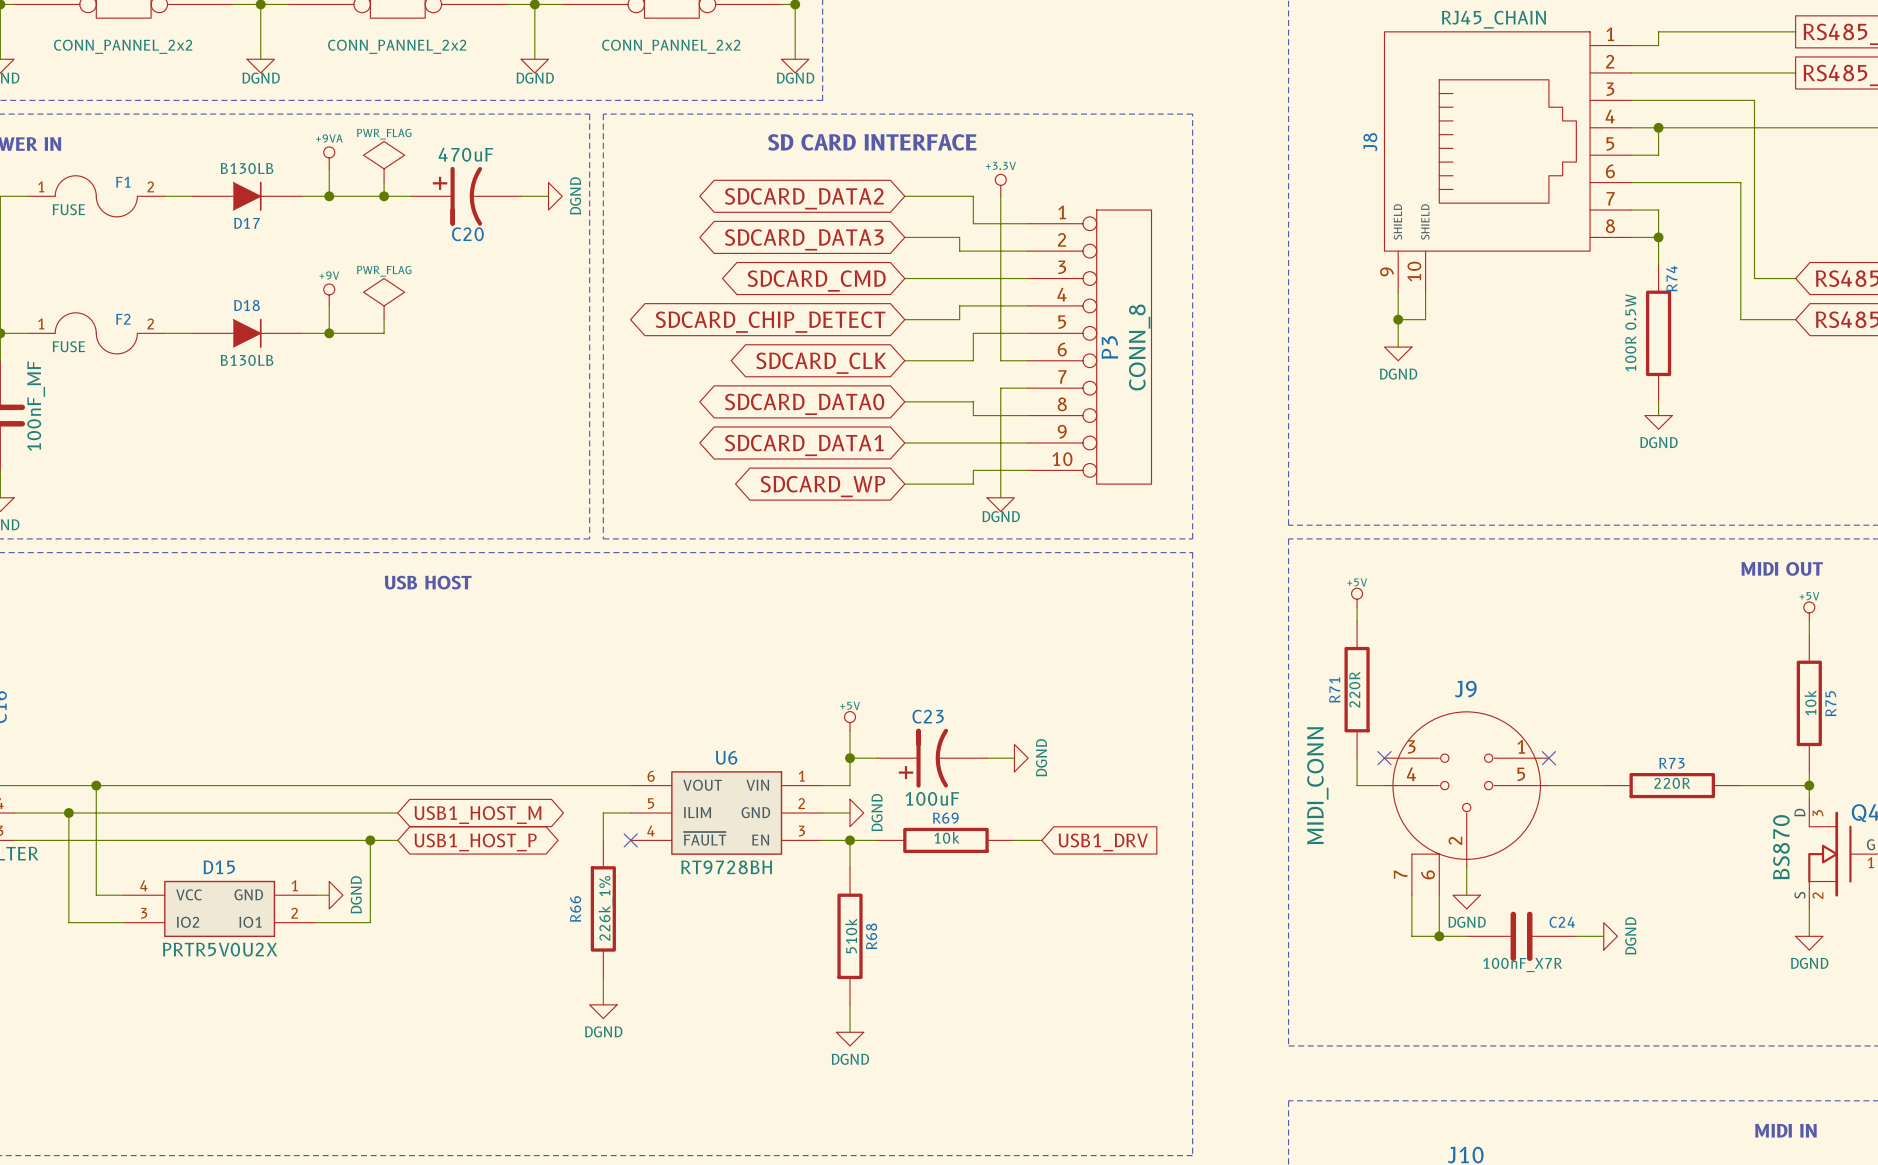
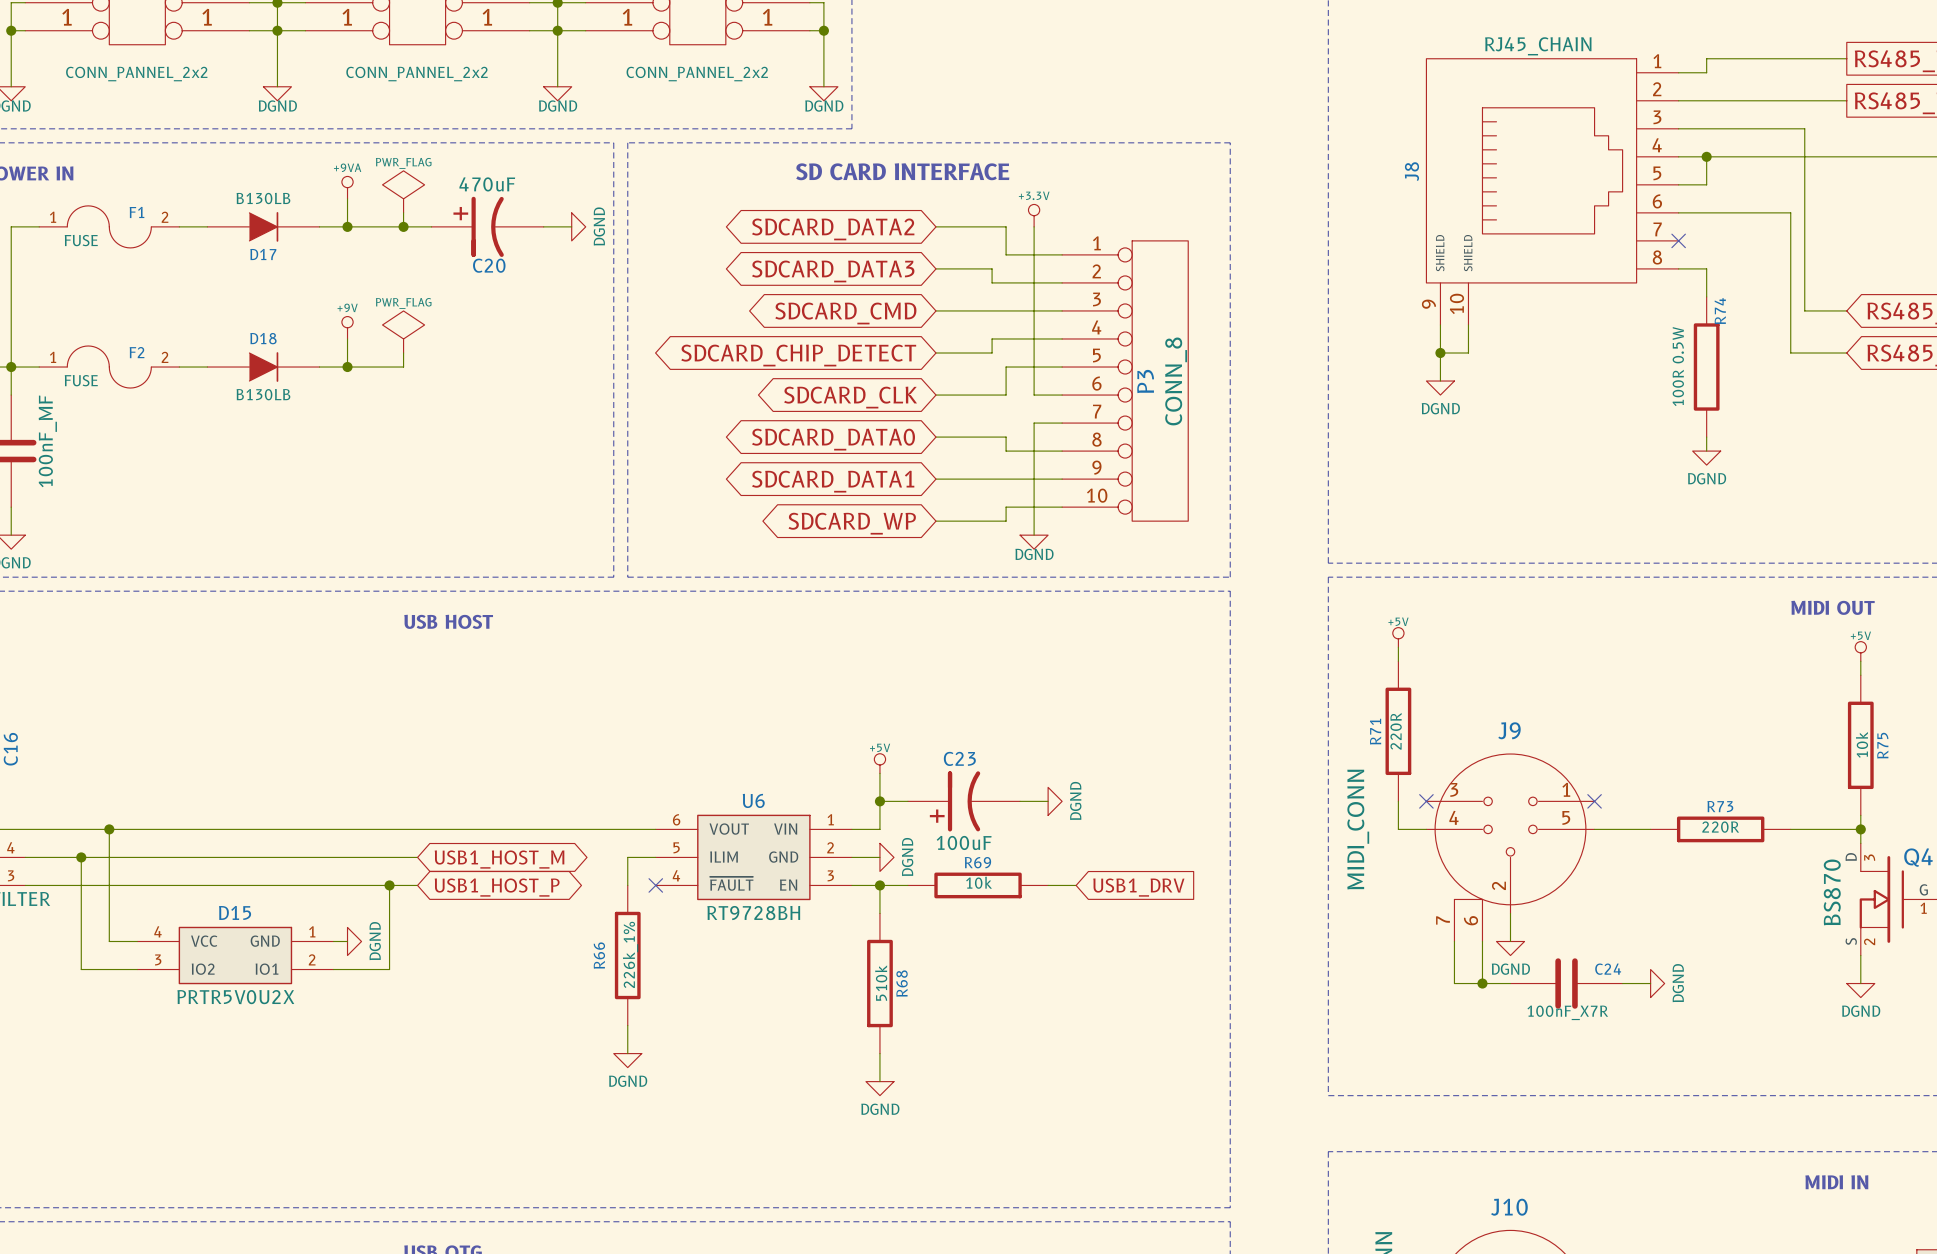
wire: (1631, 210) (1658, 210) (1658, 237) -> none
no-connect mark: none -> (1678, 240)
junction: (1658, 237) -> none

